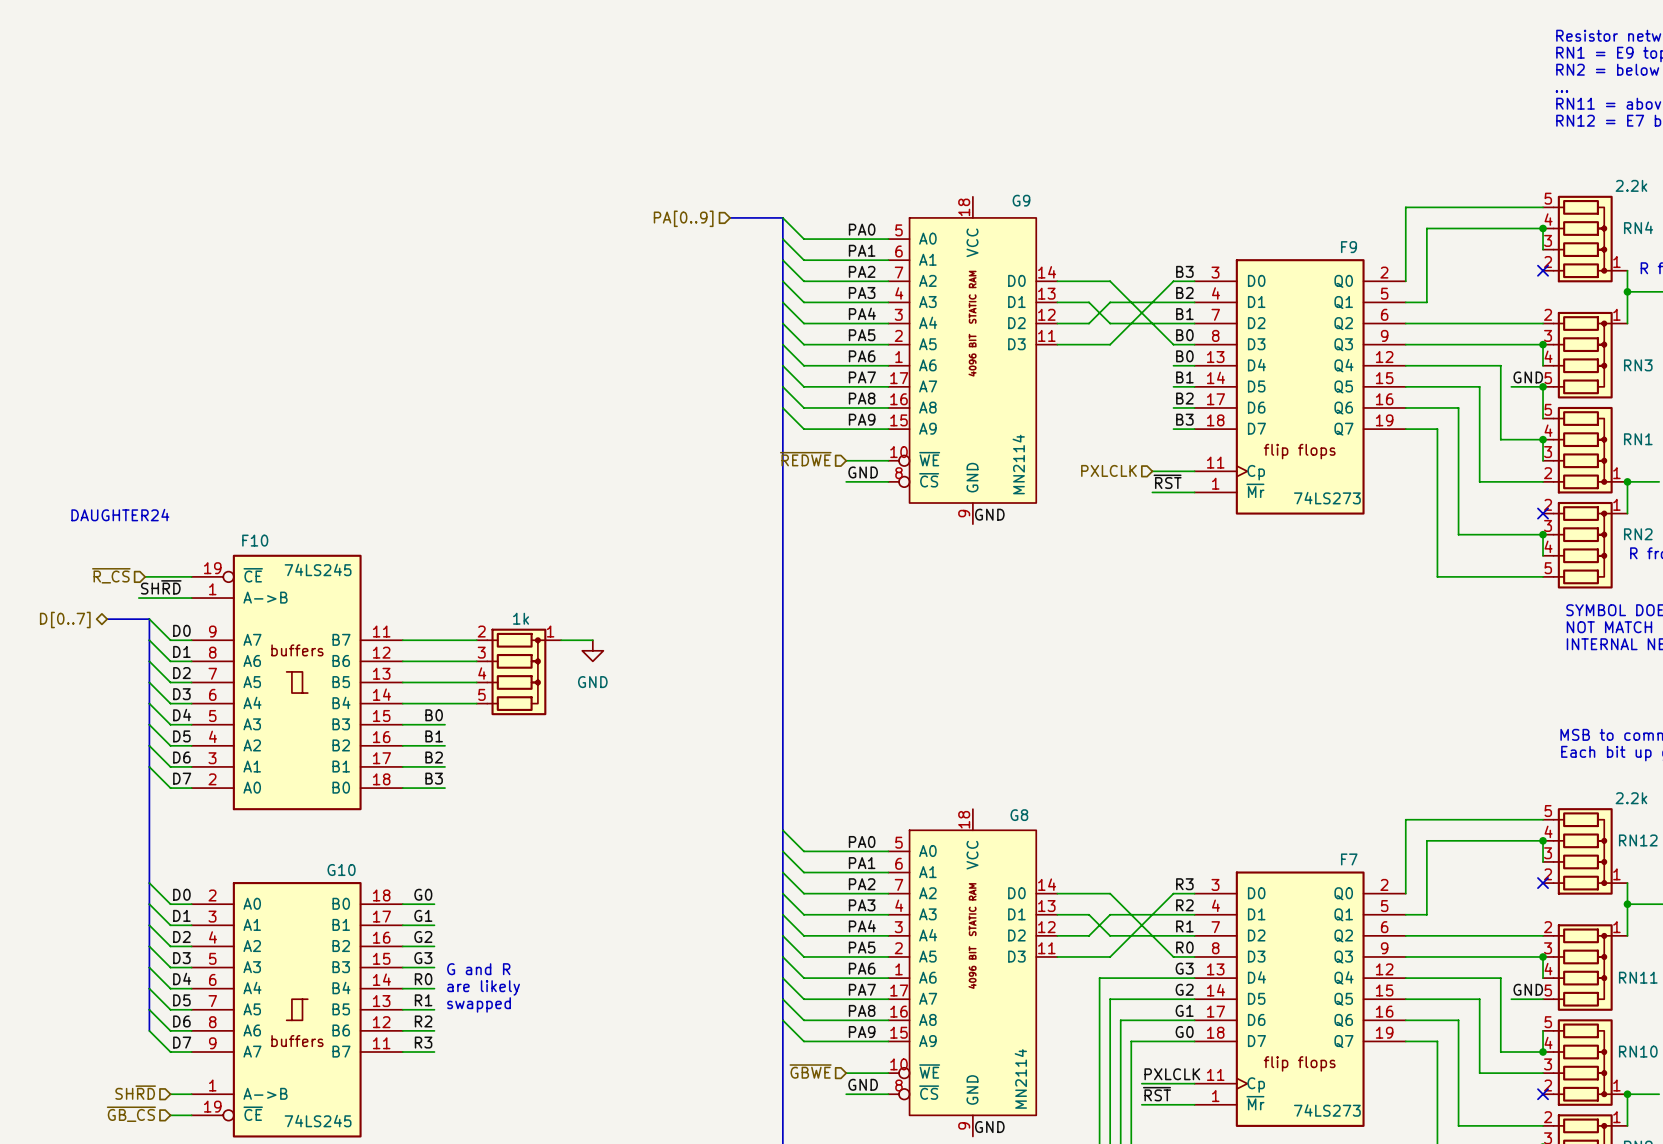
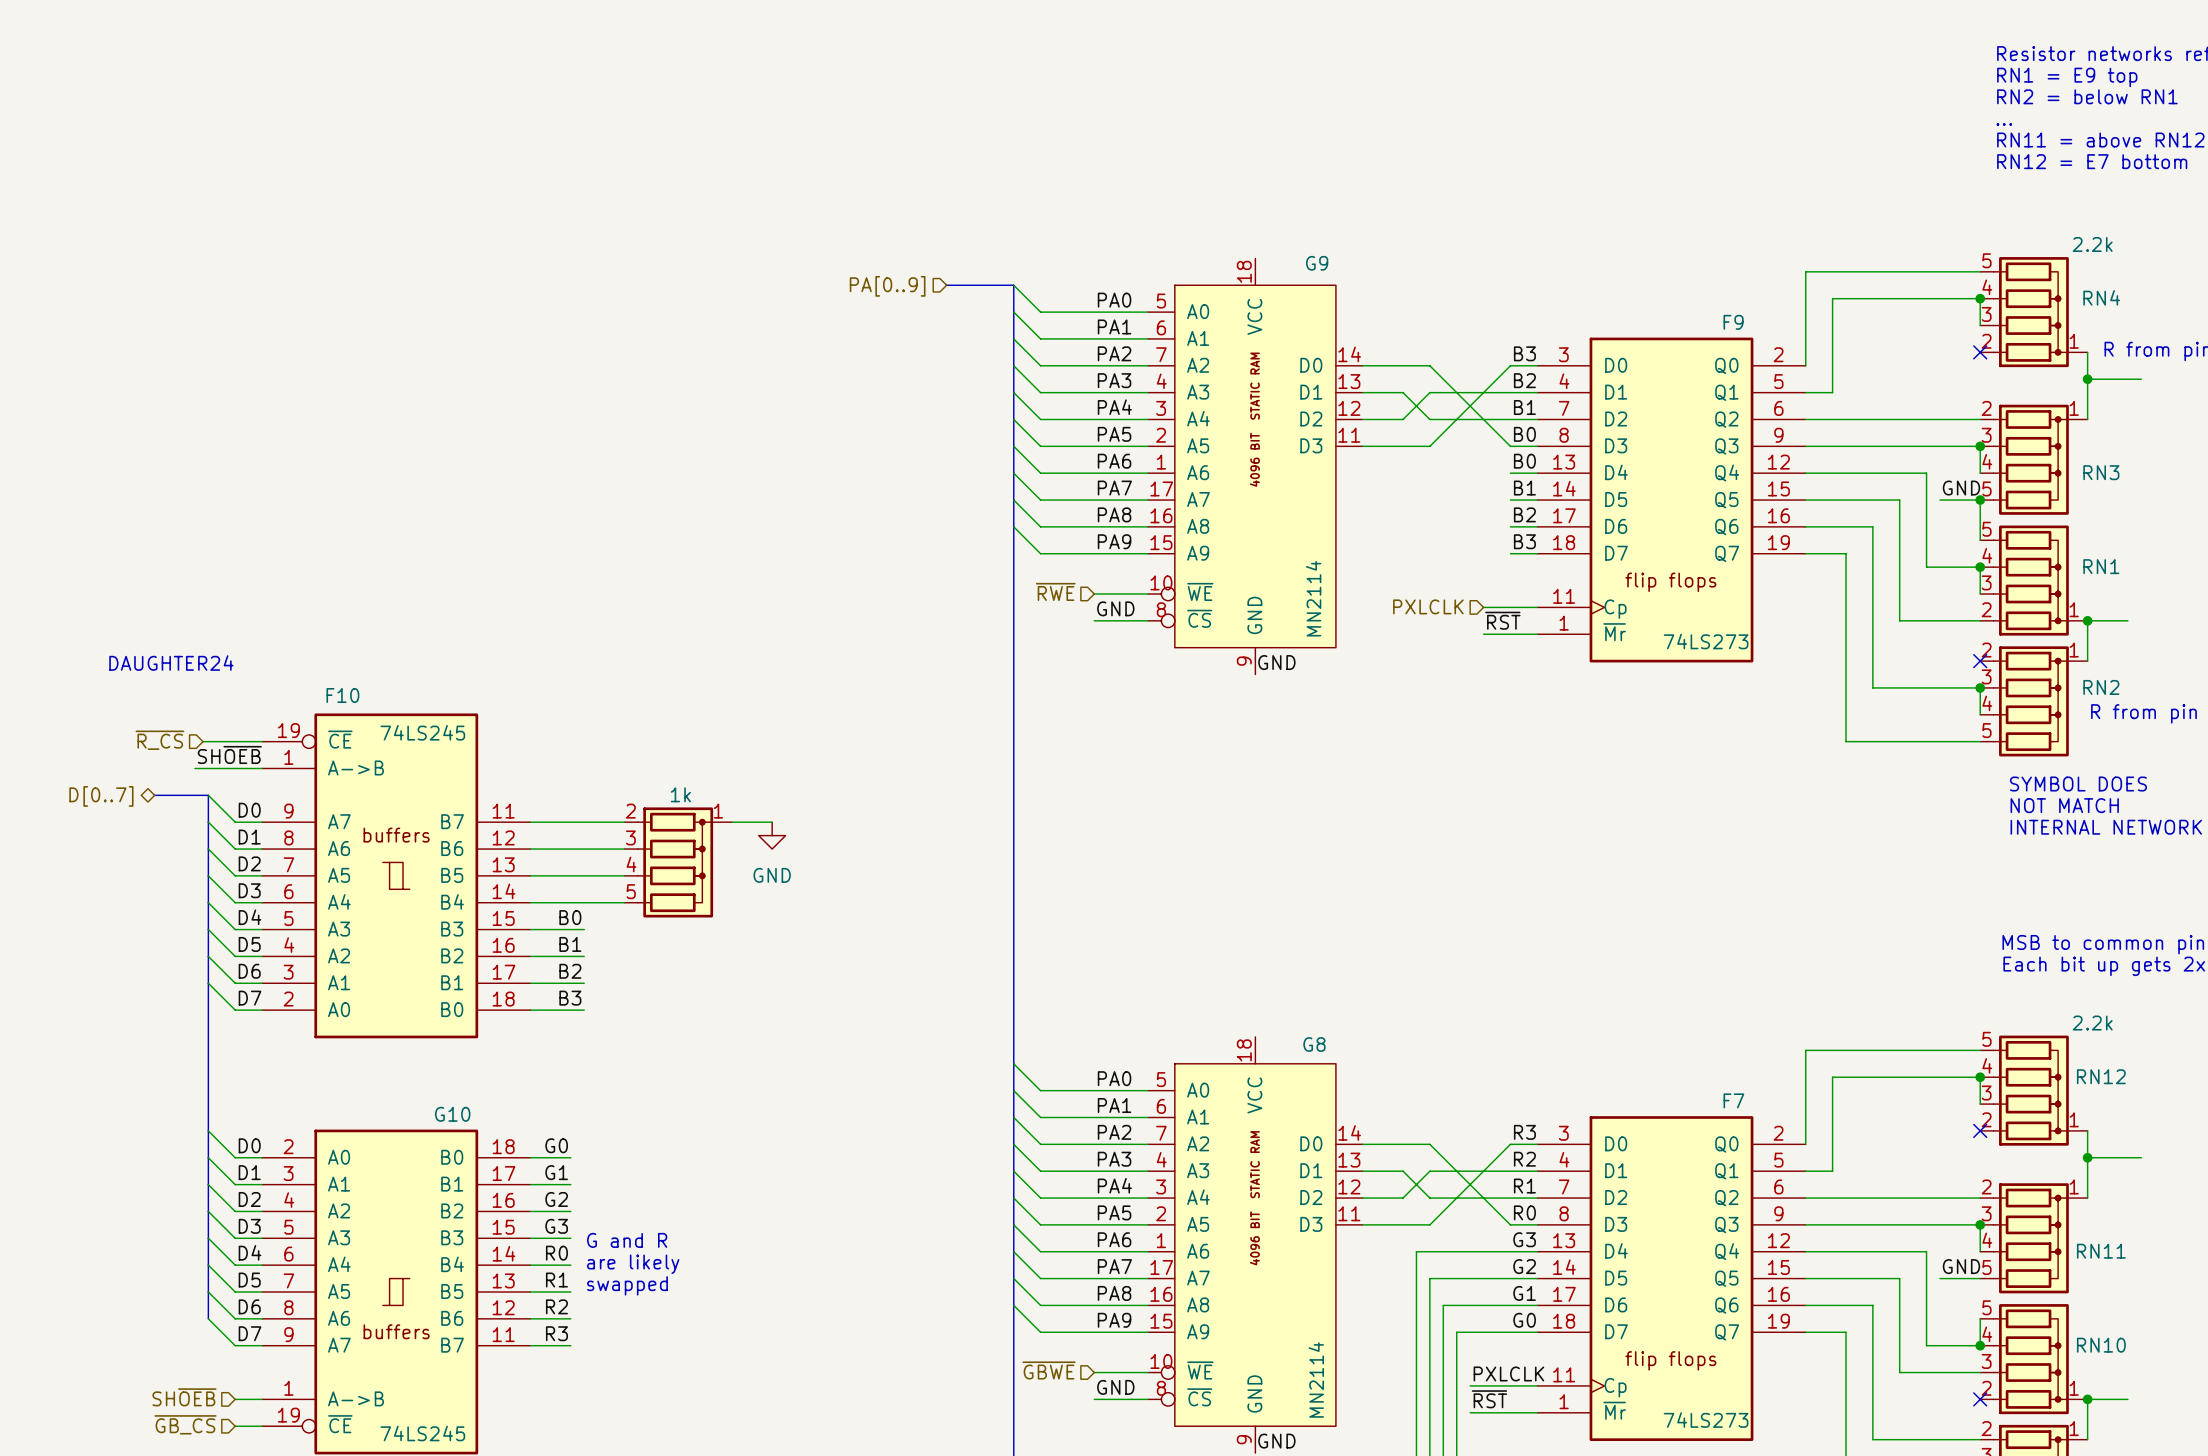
hierarchical label: ~{REDWE} (805, 459) -> ~{RWE} (1055, 591)
label: SH~{RD} (161, 587) -> SH~{OEB} (229, 754)
hierarchical label: SH~{RD} (135, 1092) -> SH~{OEB} (184, 1397)

